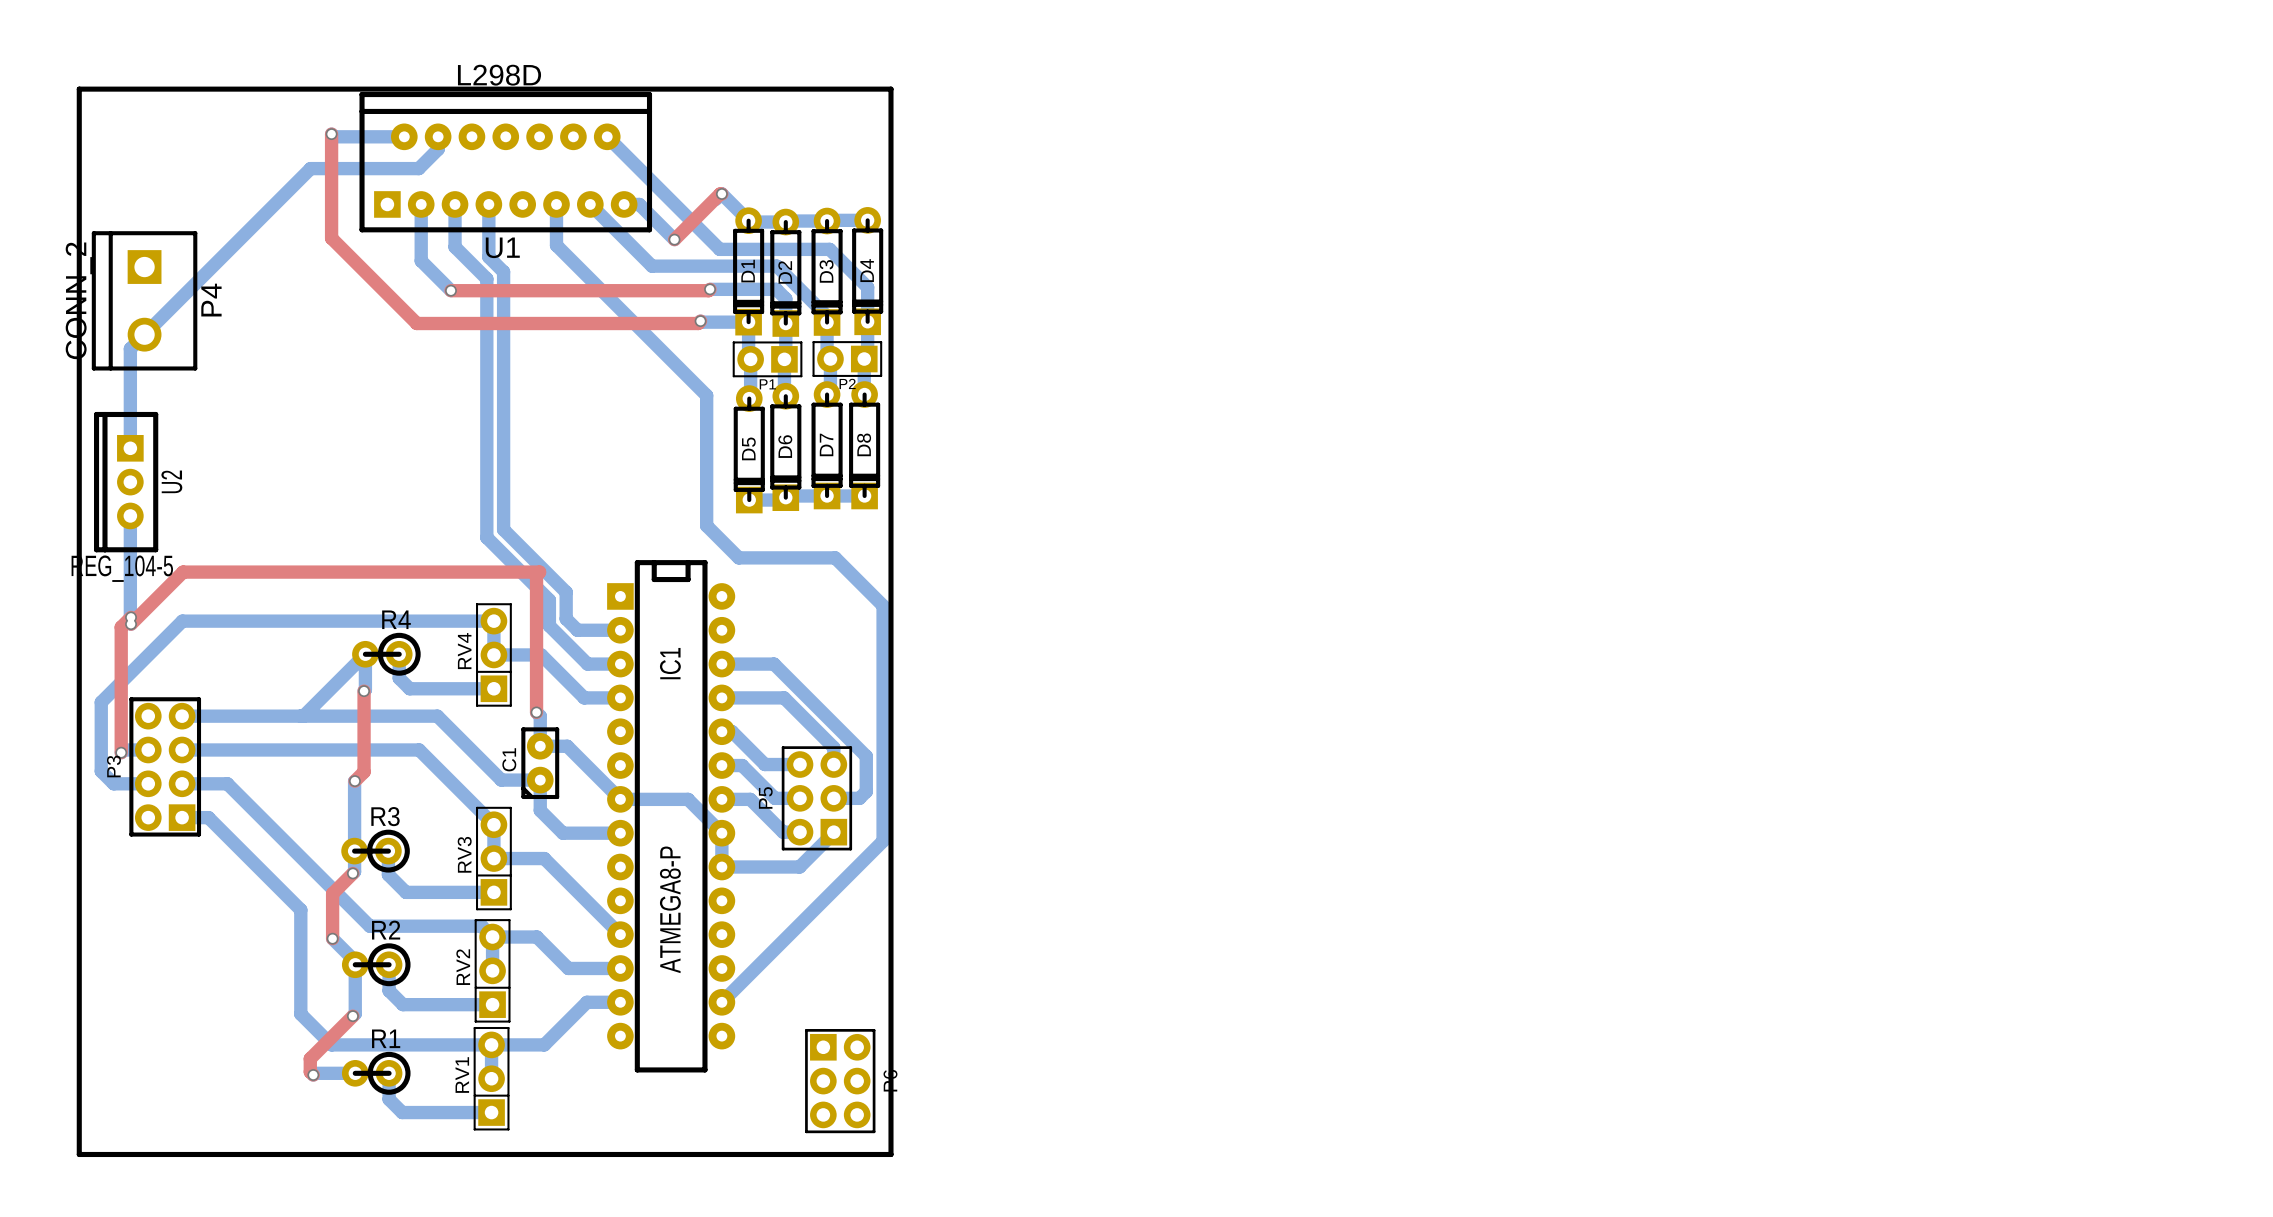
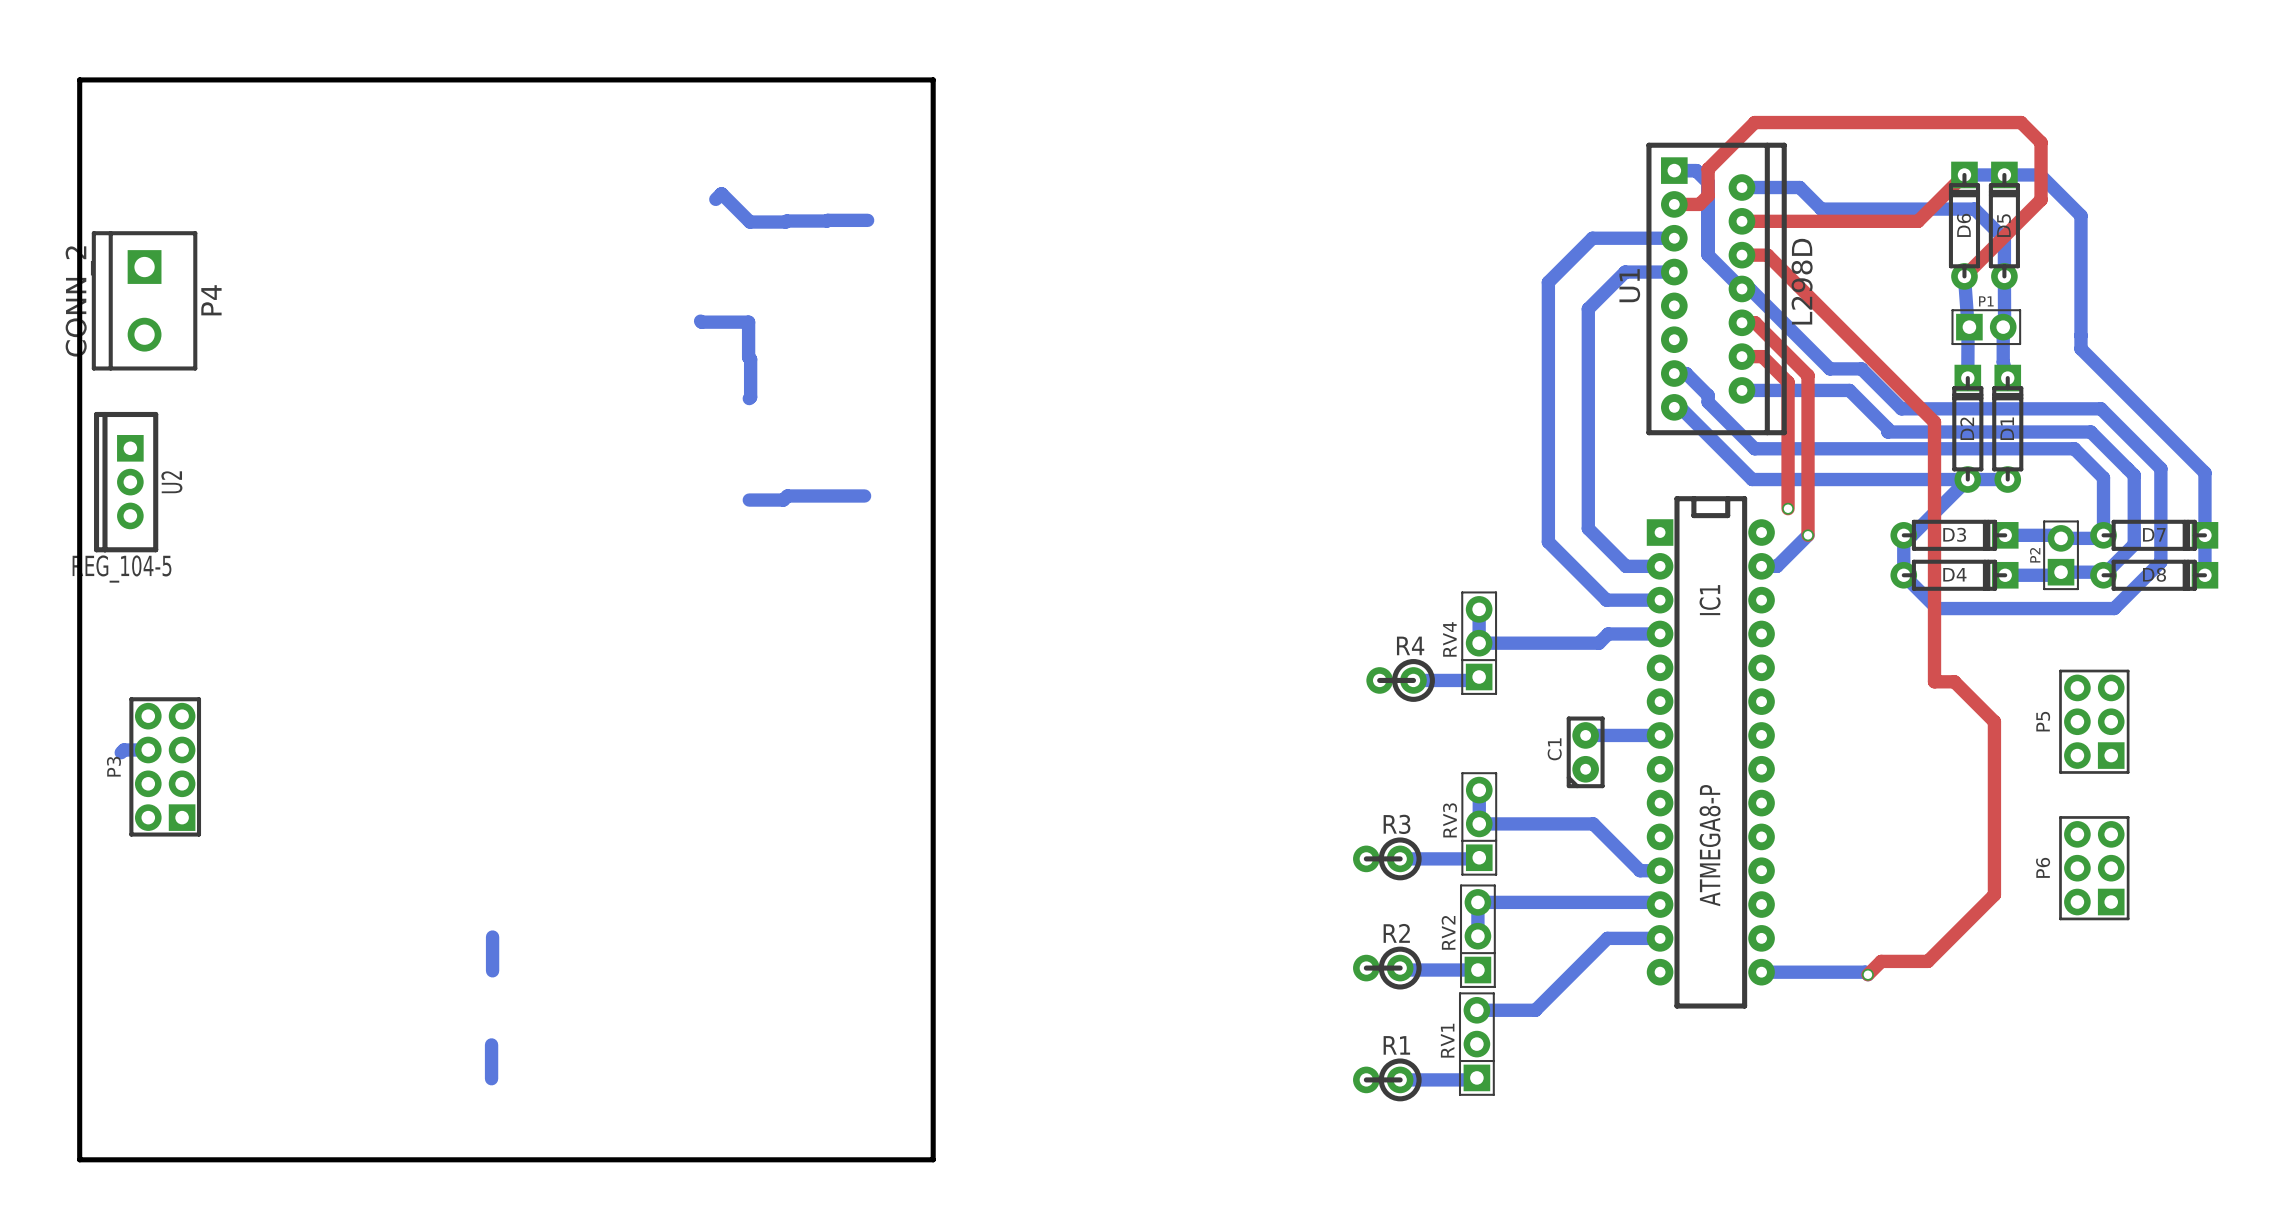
board edge: (79, 89) (890, 89) (890, 1154) (79, 1154) (79, 89) -> (79, 79) (79, 1159) (933, 1159) (933, 79) (79, 79)
bottom track: (331, 134) (334, 136) (404, 136) -> none
top track: (331, 134) (331, 238) (416, 323) (698, 323) (700, 321) -> none
via: (331, 134) -> none
bottom track: (438, 136) (438, 149) (418, 168) (310, 168) (130, 348) (130, 448) -> none
bottom track: (607, 136) (719, 249) (829, 249) (867, 287) (867, 355) (864, 359) (864, 394) -> none
U1 rotation: 0° (505, 162) -> 90° clockwise (1716, 288)
U1 position: (505, 162) -> (1716, 288)
bottom track: none -> (1674, 170) (1696, 170) (1708, 182) (1708, 255) (1741, 288) (1749, 288) (1829, 368) (1861, 368) (1901, 408) (2100, 408) (2160, 468) (2160, 561) (2114, 608) (1937, 608) (1903, 575) (1903, 535) (1912, 535) (1967, 479)
bottom track: none -> (1964, 174) (2040, 174) (2080, 215) (2080, 348) (2204, 472) (2204, 575)
top track: none -> (1964, 174) (1918, 221) (1741, 221)
bottom track: none -> (1741, 187) (1799, 187) (1821, 209) (1974, 209) (2004, 239) (2003, 362) (2007, 378)
top track: (721, 193) (674, 239) -> none
via: (721, 193) -> none
bottom track: (421, 204) (421, 260) (450, 290) -> none
bottom track: (455, 204) (455, 247) (486, 278) (486, 537) (549, 600) (549, 625) (587, 664) (620, 664) -> none
bottom track: (488, 204) (488, 257) (503, 271) (503, 529) (566, 592) (566, 618) (577, 630) (620, 630) -> none
bottom track: (556, 204) (556, 245) (706, 395) (706, 525) (738, 557) (835, 557) (883, 605) (883, 841) (721, 1002) -> none
bottom track: (590, 204) (652, 266) (776, 266) (827, 316) (827, 355) (830, 359) (830, 391) (827, 394) -> none
bottom track: (624, 204) (639, 204) (674, 239) -> none
top track: none -> (1674, 204) (1699, 204) (1708, 195) (1708, 169) (1754, 122) (2021, 122) (2041, 142) (2041, 199) (1964, 276)
bottom track: none -> (1674, 238) (1592, 238) (1548, 282) (1548, 541) (1606, 600) (1660, 600)
via: (674, 239) -> none
top track: none -> (1741, 255) (1767, 255) (1934, 422) (1934, 681) (1954, 681) (1994, 721) (1994, 894) (1927, 961) (1881, 961) (1867, 974)
D1 rotation: 0° (748, 271) -> 180° (2007, 428)
D1 position: (748, 271) -> (2007, 428)
D3 rotation: 0° (827, 271) -> 90° counterclockwise (1954, 535)
D3 position: (827, 271) -> (1954, 535)
D4 rotation: 0° (867, 271) -> 90° counterclockwise (1954, 575)
D4 position: (867, 271) -> (1954, 575)
D2 rotation: 0° (785, 272) -> 180° (1967, 428)
D2 position: (785, 272) -> (1967, 428)
bottom track: none -> (1674, 272) (1625, 272) (1588, 308) (1588, 528) (1625, 566) (1660, 566)
bottom track: none -> (1964, 276) (1968, 325) (1967, 378)
bottom track: (710, 289) (776, 289) (785, 298) (785, 396) -> none
top track: (710, 289) (450, 290) -> none
via: (710, 289) -> none
via: (450, 290) -> none
via: (700, 321) -> none
top track: none -> (1741, 322) (1755, 322) (1808, 375) (1808, 535)
top track: none -> (1741, 356) (1762, 356) (1788, 382) (1788, 508)
P1 rotation: 0° (767, 359) -> 180° (1986, 327)
P1 position: (767, 359) -> (1986, 327)
P2 rotation: 0° (847, 359) -> 90° clockwise (2061, 555)
P2 position: (847, 359) -> (2061, 555)
bottom track: none -> (1674, 373) (1686, 373) (1708, 395) (1708, 402) (1754, 448) (2074, 448) (2103, 477) (2103, 535) (2100, 538) (2061, 538) (2057, 535) (2005, 535)
bottom track: none -> (1741, 390) (1849, 390) (1887, 428) (1887, 432) (2090, 432) (2134, 475) (2134, 544) (2103, 575) (2100, 572) (2061, 572) (2057, 575) (2005, 575)
bottom track: none -> (1674, 407) (1680, 407) (1752, 479) (2007, 479)
D7 rotation: 0° (827, 445) -> 90° counterclockwise (2154, 535)
D7 position: (827, 445) -> (2154, 535)
D8 rotation: 0° (864, 445) -> 90° counterclockwise (2154, 575)
D8 position: (864, 445) -> (2154, 575)
D6 rotation: 0° (785, 446) -> 180° (1964, 225)
D6 position: (785, 446) -> (1964, 225)
D5 rotation: 0° (749, 449) -> 180° (2004, 225)
D5 position: (749, 449) -> (2004, 225)
via: none -> (1788, 508)
bottom track: (130, 515) (131, 624) -> none
bottom track: none -> (1808, 535) (1777, 566) (1761, 566)
via: none -> (1808, 535)
bottom track: none -> (1479, 609) (1479, 643) (1598, 643) (1608, 633) (1660, 633)
top track: (131, 617) (121, 627) (121, 752) -> none
via: (131, 617) -> none
top track: (131, 624) (183, 572) (539, 572) (536, 575) (536, 712) -> none
via: (131, 624) -> none
R4 position: (386, 654) -> (1400, 680)
bottom track: (399, 654) (399, 678) (409, 688) (493, 688) -> none
RV4 position: (493, 654) -> (1479, 643)
bottom track: (721, 664) (774, 664) (866, 756) (866, 791) (859, 798) (833, 798) -> none
bottom track: none -> (1479, 677) (1475, 680) (1413, 680)
bottom track: (364, 691) (365, 654) (303, 716) -> none
top track: (364, 691) (364, 771) (354, 781) -> none
via: (364, 691) -> none
bottom track: (620, 697) (584, 697) (541, 654) (493, 654) (493, 621) (182, 621) (101, 702) (101, 771) (113, 783) (148, 783) -> none
bottom track: (721, 697) (784, 697) (833, 747) (833, 764) -> none
bottom track: (536, 712) (540, 716) (540, 746) (567, 746) (620, 799) (688, 799) (721, 833) (721, 867) (799, 867) (833, 832) -> none
via: (536, 712) -> none
bottom track: (182, 716) (437, 716) (501, 780) (540, 780) (540, 810) (562, 833) (620, 833) -> none
bottom track: (721, 731) (732, 731) (764, 764) (800, 764) -> none
bottom track: none -> (1585, 735) (1660, 735)
bottom track: (182, 749) (419, 749) (493, 824) (493, 858) (544, 858) (620, 934) -> none
via: (121, 752) -> none
C1 position: (540, 763) -> (1585, 752)
bottom track: (721, 765) (742, 765) (774, 798) (800, 798) -> none
bottom track: (354, 781) (354, 871) (352, 873) -> none
via: (354, 781) -> none
bottom track: (182, 783) (227, 783) (369, 926) (481, 926) (492, 937) (536, 937) (568, 968) (620, 968) -> none
bottom track: none -> (1479, 790) (1479, 823) (1593, 823) (1640, 870) (1660, 870)
P5 position: (816, 798) -> (2094, 721)
bottom track: (721, 799) (750, 799) (783, 832) (800, 832) -> none
IC1 position: (671, 816) -> (1710, 752)
bottom track: (182, 817) (208, 817) (300, 909) (300, 1014) (331, 1044) (544, 1044) (586, 1002) (620, 1002) -> none
R3 position: (375, 851) -> (1387, 858)
bottom track: (388, 851) (388, 874) (405, 892) (493, 892) -> none
bottom track: none -> (1479, 857) (1400, 858)
RV3 position: (493, 858) -> (1479, 823)
top track: (352, 873) (332, 893) (332, 938) -> none
via: (352, 873) -> none
bottom track: none -> (1660, 904) (1657, 902) (1477, 902) (1477, 936)
bottom track: (332, 938) (355, 961) (355, 1013) (352, 1016) -> none
via: (332, 938) -> none
bottom track: none -> (1660, 938) (1607, 938) (1535, 1010) (1476, 1010)
R2 position: (376, 964) -> (1387, 968)
bottom track: (389, 964) (389, 990) (402, 1004) (492, 1004) -> none
bottom track: none -> (1400, 968) (1402, 970) (1477, 970)
RV2 position: (492, 970) -> (1477, 936)
bottom track: none -> (1761, 972) (1865, 972) (1867, 974)
via: none -> (1867, 974)
top track: (352, 1016) (310, 1058) (310, 1071) (313, 1075) -> none
via: (352, 1016) -> none
bottom track: (355, 1073) (315, 1073) (313, 1075) -> none
R1 position: (376, 1073) -> (1387, 1079)
bottom track: (389, 1073) (389, 1099) (402, 1112) (491, 1112) -> none
via: (313, 1075) -> none
bottom track: none -> (1476, 1077) (1474, 1079) (1400, 1079)
RV1 position: (491, 1078) -> (1476, 1044)
P6 rotation: 0° (840, 1081) -> 180° (2094, 868)
P6 position: (840, 1081) -> (2094, 868)

